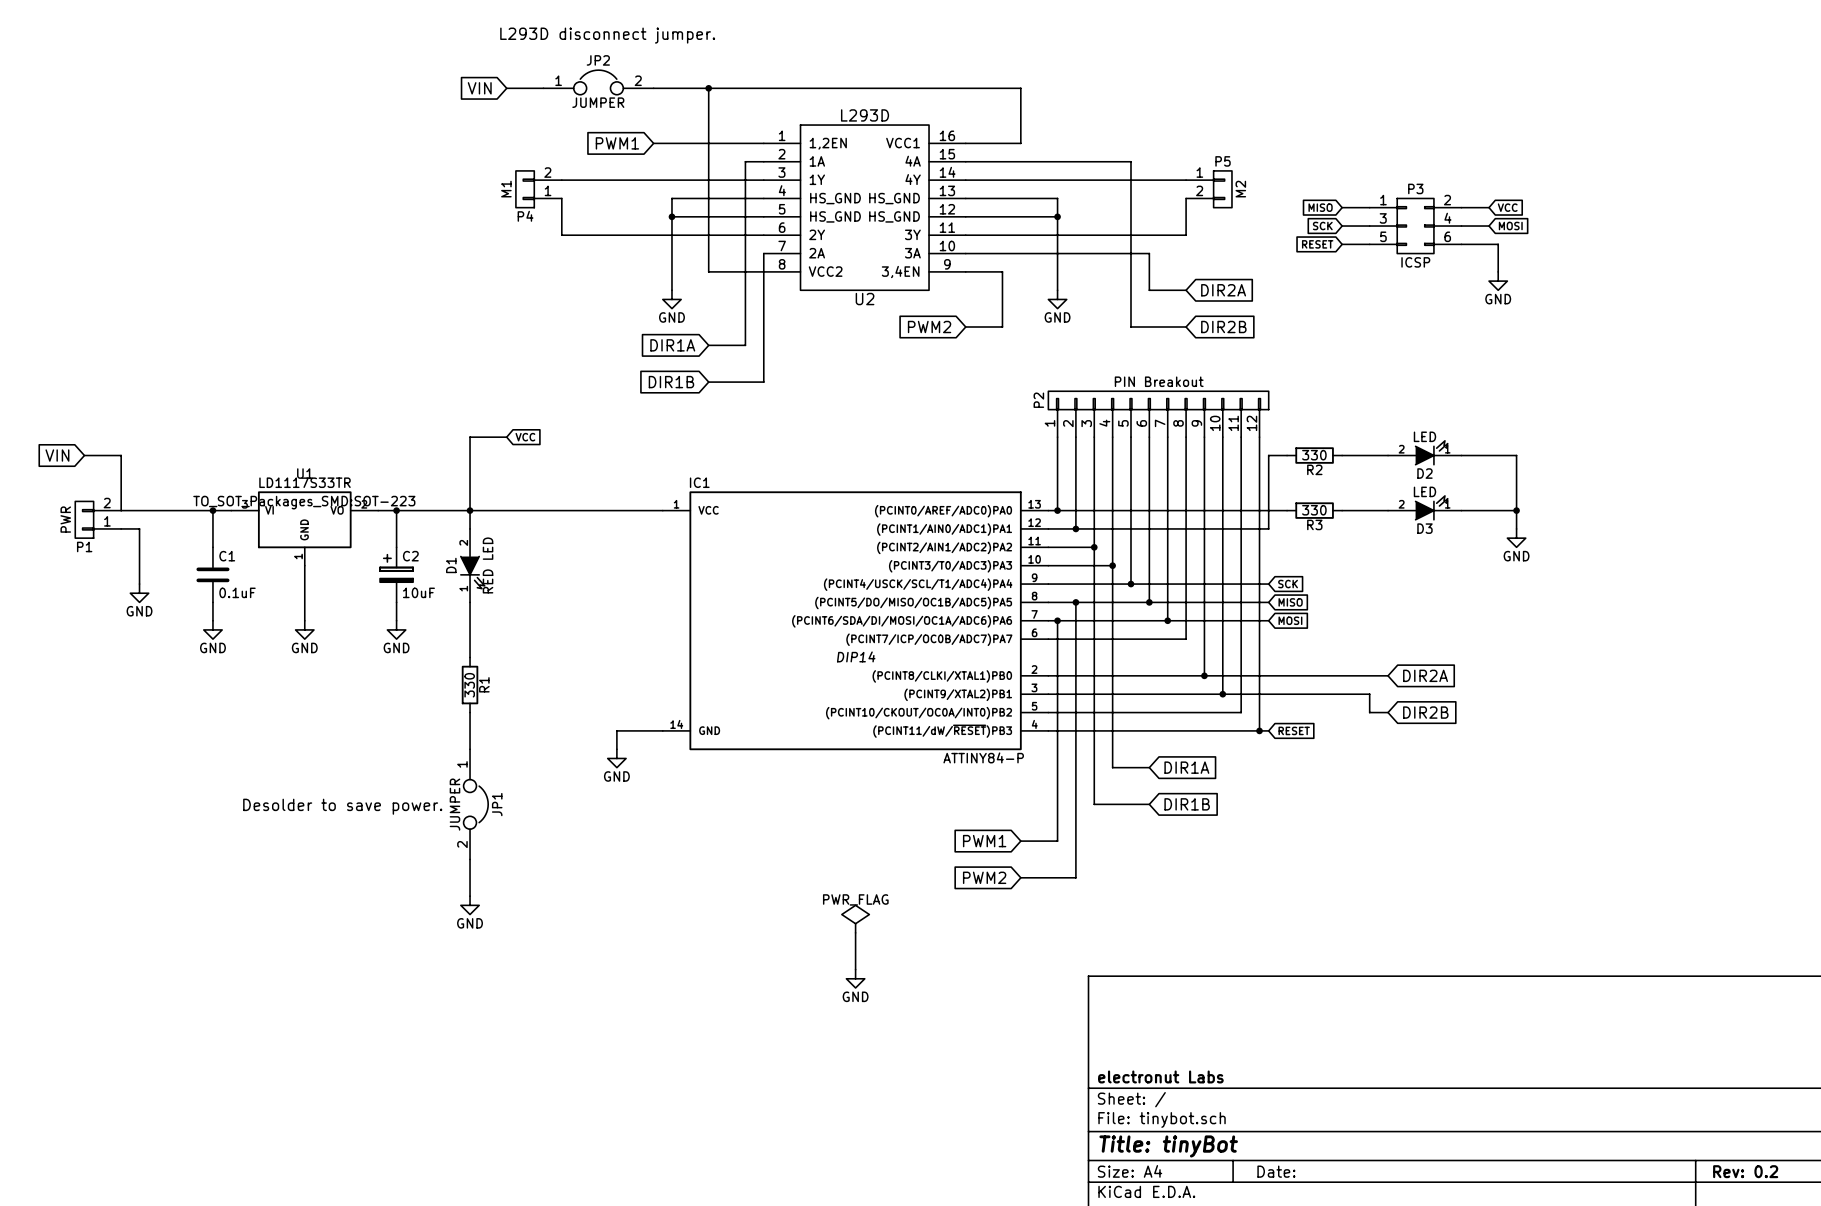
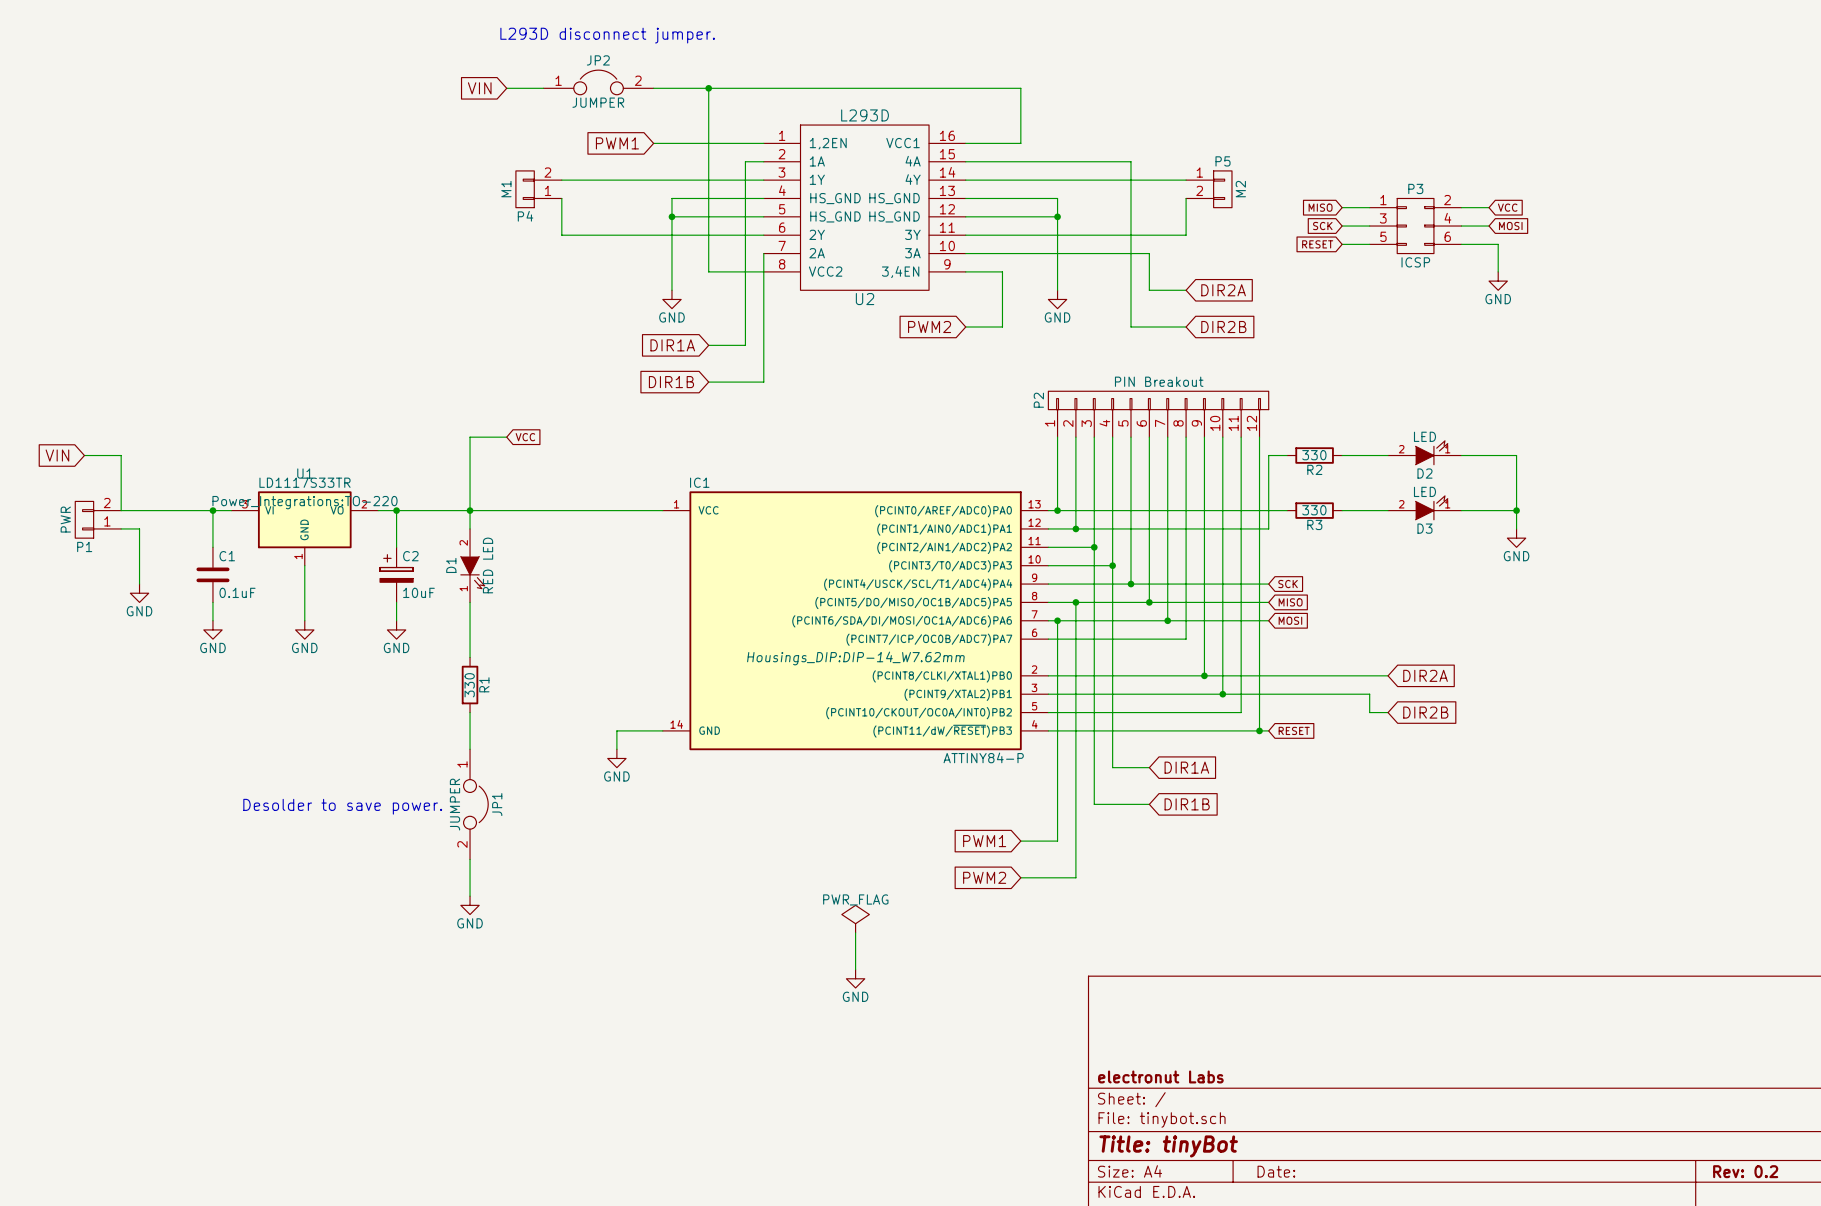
U1 text: TO_SOT_Packages_SMD:SOT-223 (304, 502) -> Power_Integrations:TO-220 (304, 502)
IC1 text: DIP14 (856, 656) -> Housings_DIP:DIP-14_W7.62mm (855, 658)

